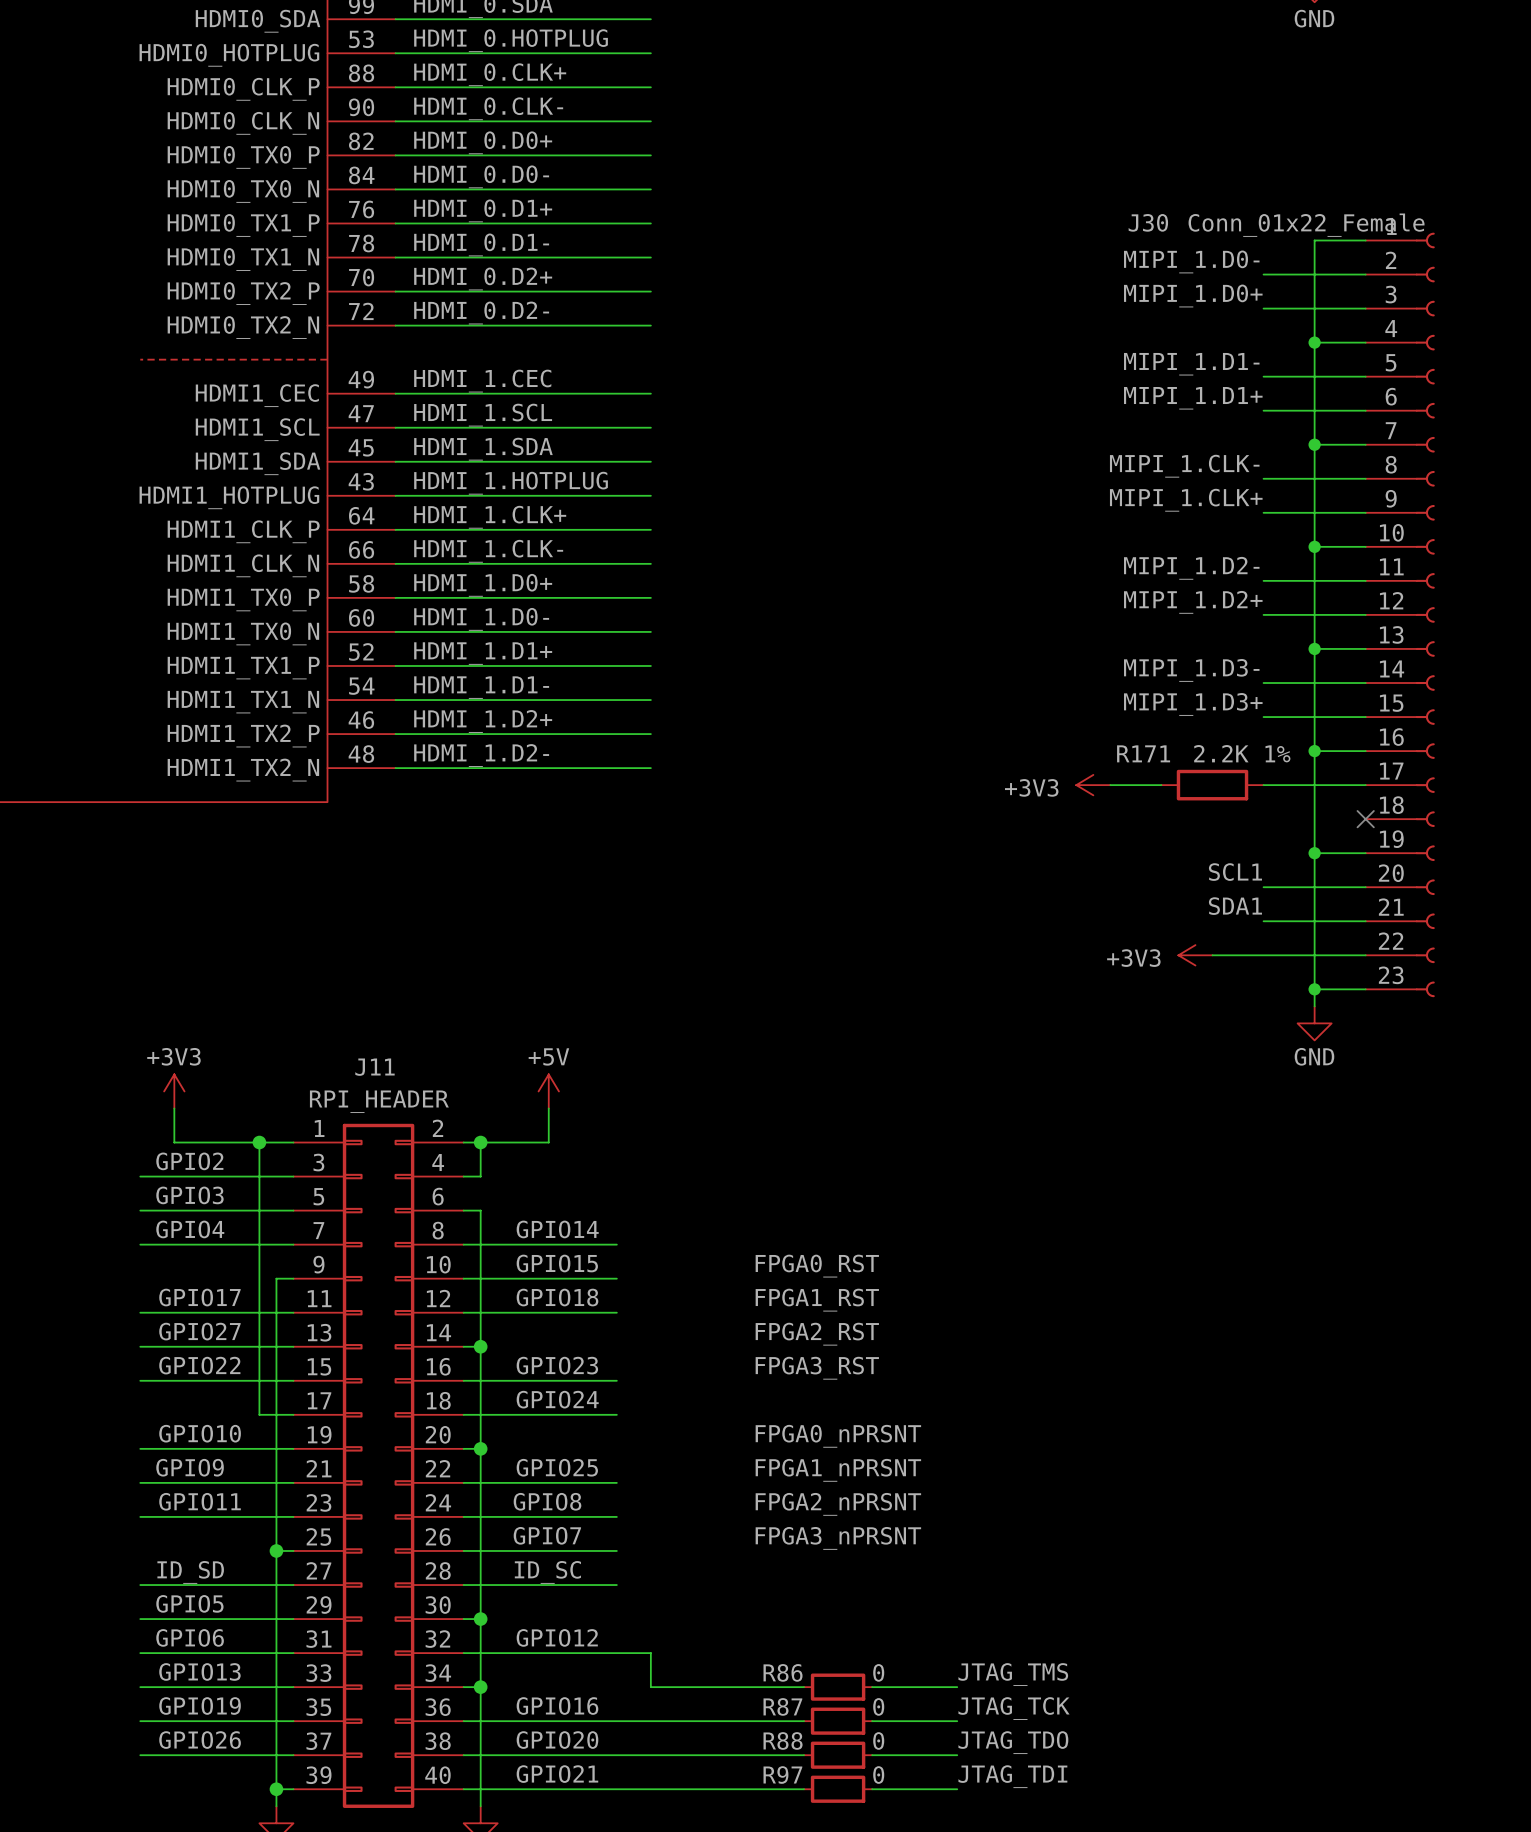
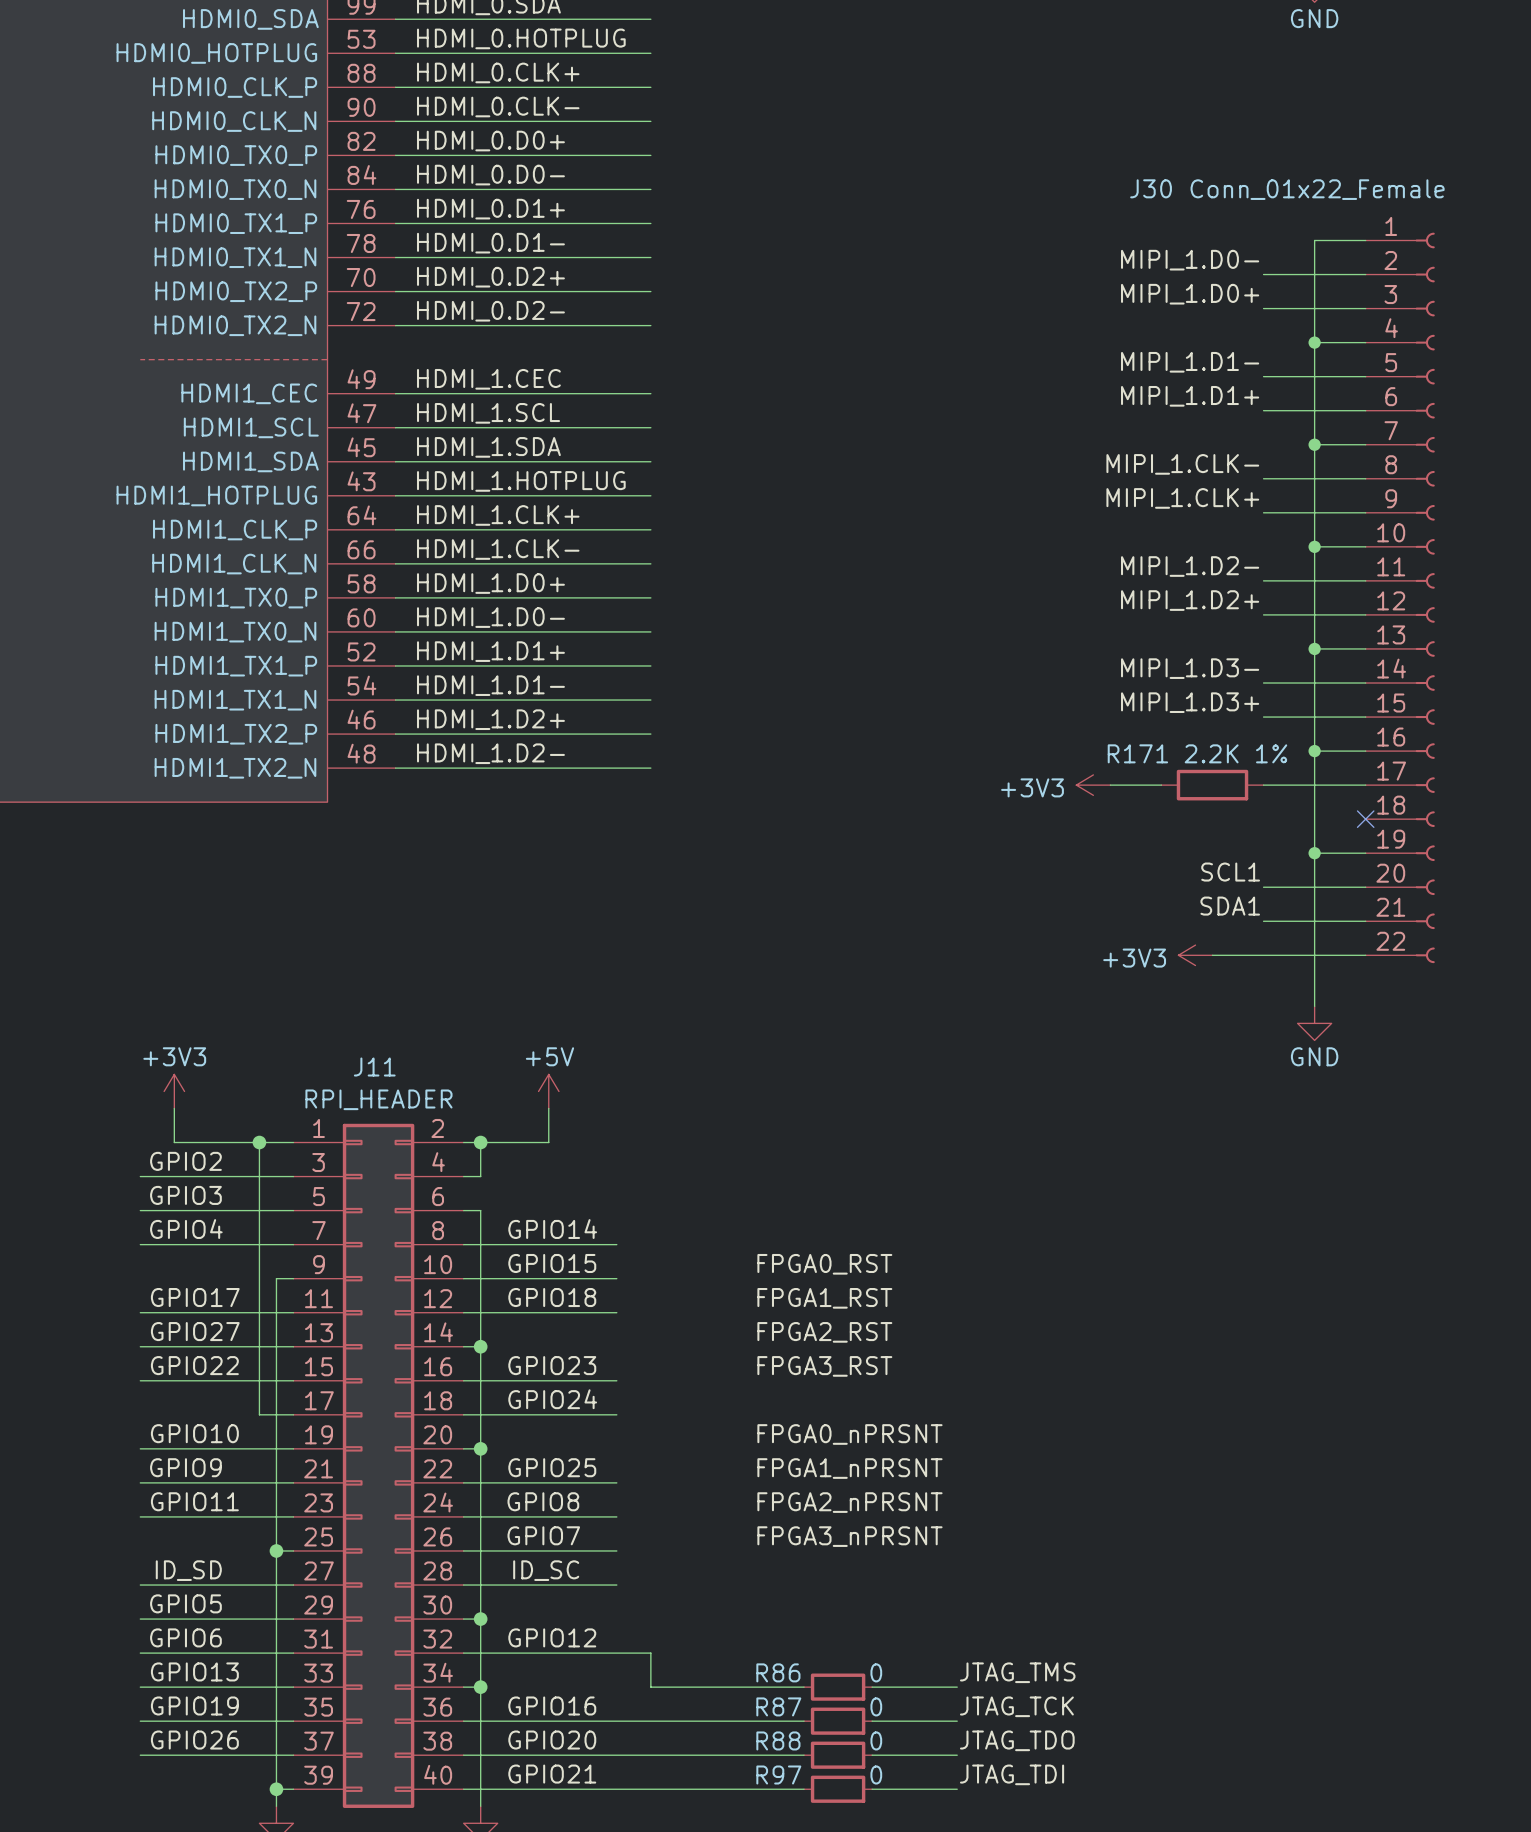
J30 symbol: [1365, 232, 1435, 998] -> [1365, 232, 1435, 964]
wire: (1314, 989) (1365, 989) -> none
junction: (1314, 989) -> none

